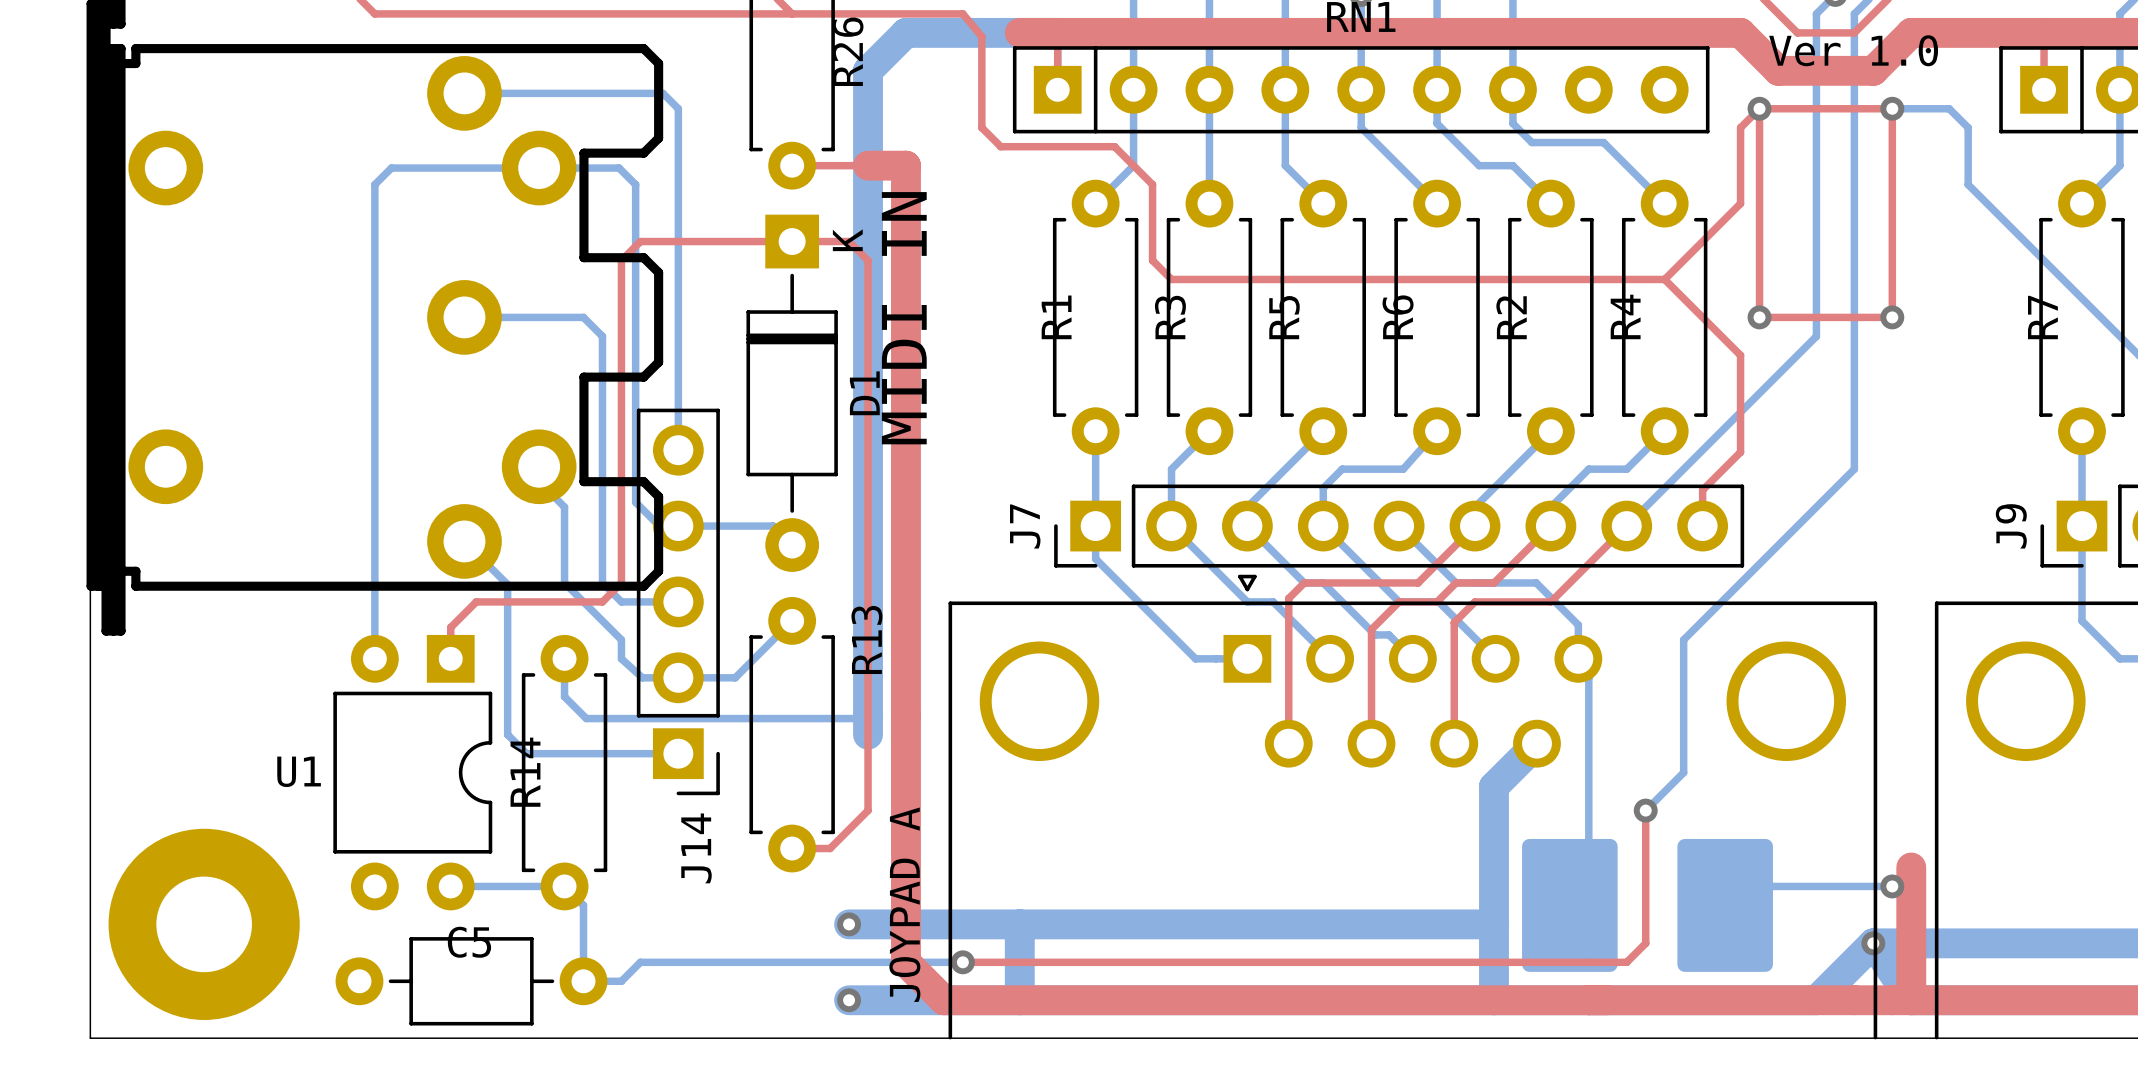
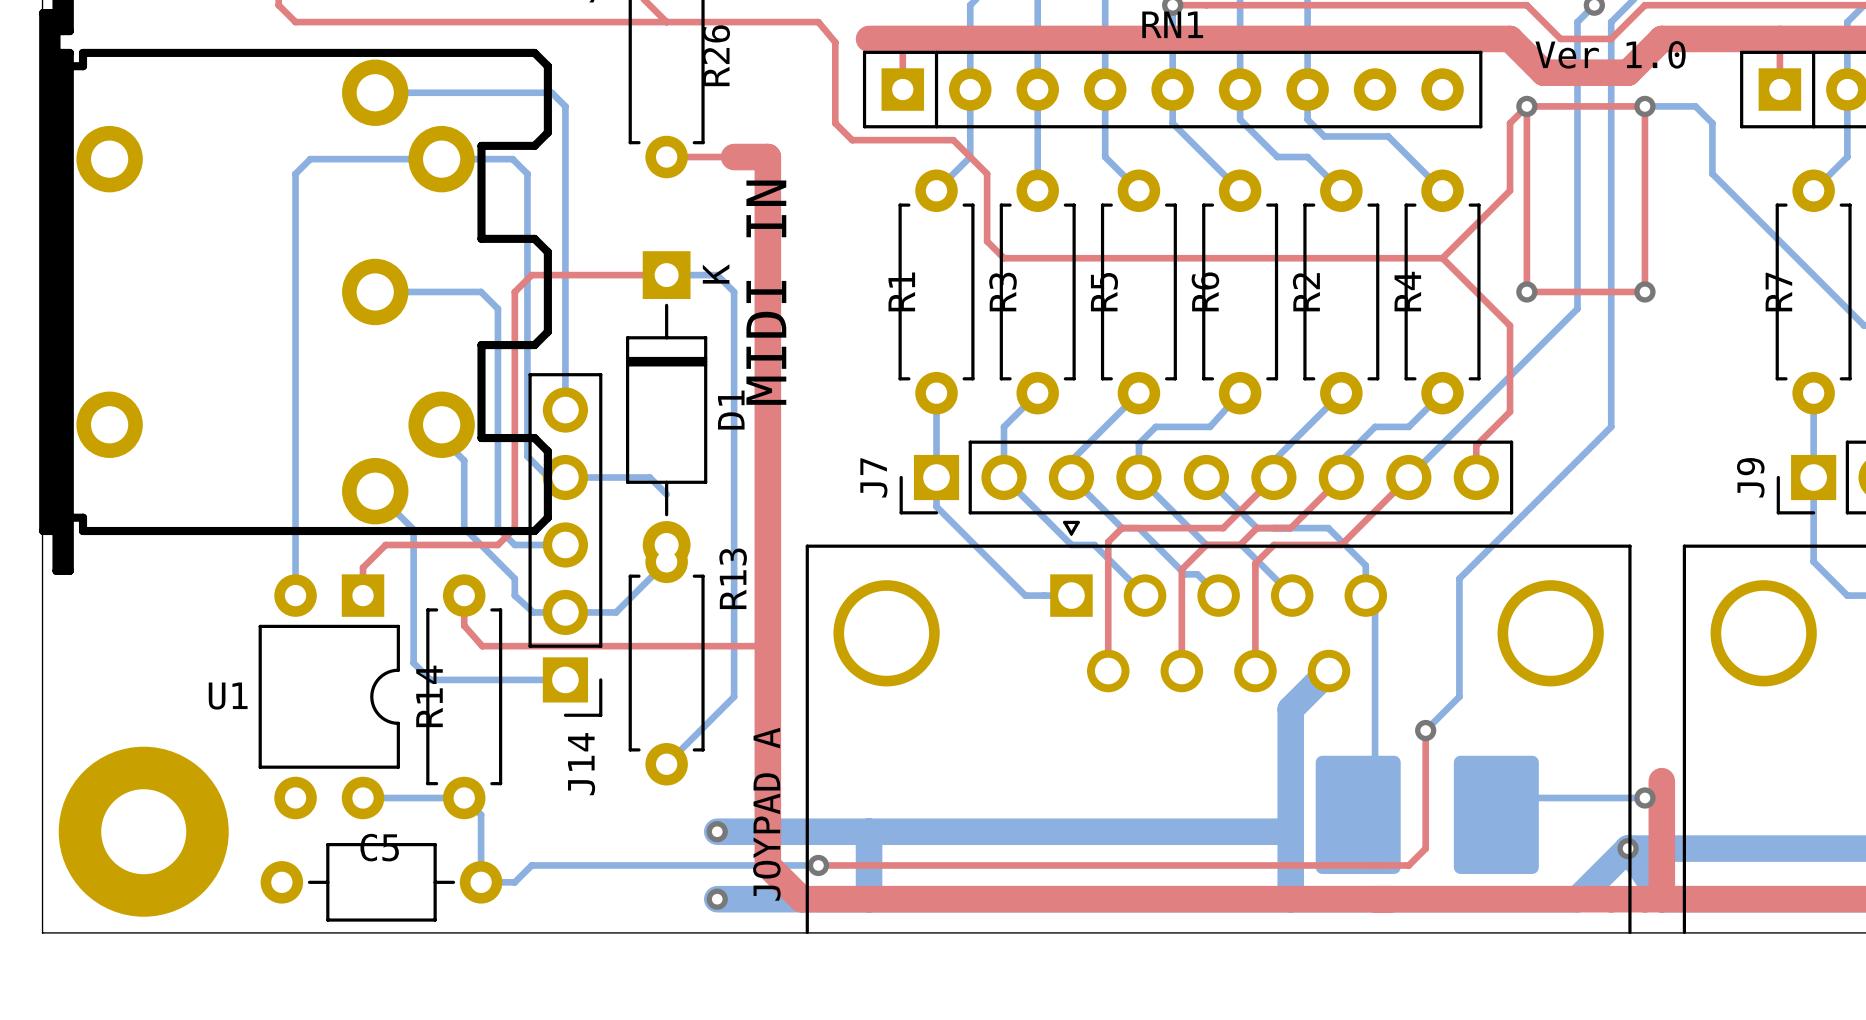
bottom track: (1057, 89) (1057, 32) (905, 32) (868, 70) (868, 317) -> (666, 275) (717, 275) (734, 291)
top track: (621, 317) (621, 260) (640, 241) (849, 241) (868, 260) (868, 810) (830, 848) (792, 848) -> (514, 291) (531, 275) (666, 275)
bottom track width: thick (868, 317) (868, 734) -> thin (734, 291) (734, 663)
D1 position: (792, 393) -> (666, 410)
top track: none -> (464, 595) (464, 625) (482, 646) (767, 646)
bottom track: (564, 658) (564, 696) (586, 718) (865, 718) (868, 715) -> none
bottom track: none -> (734, 663) (734, 696) (666, 764)

